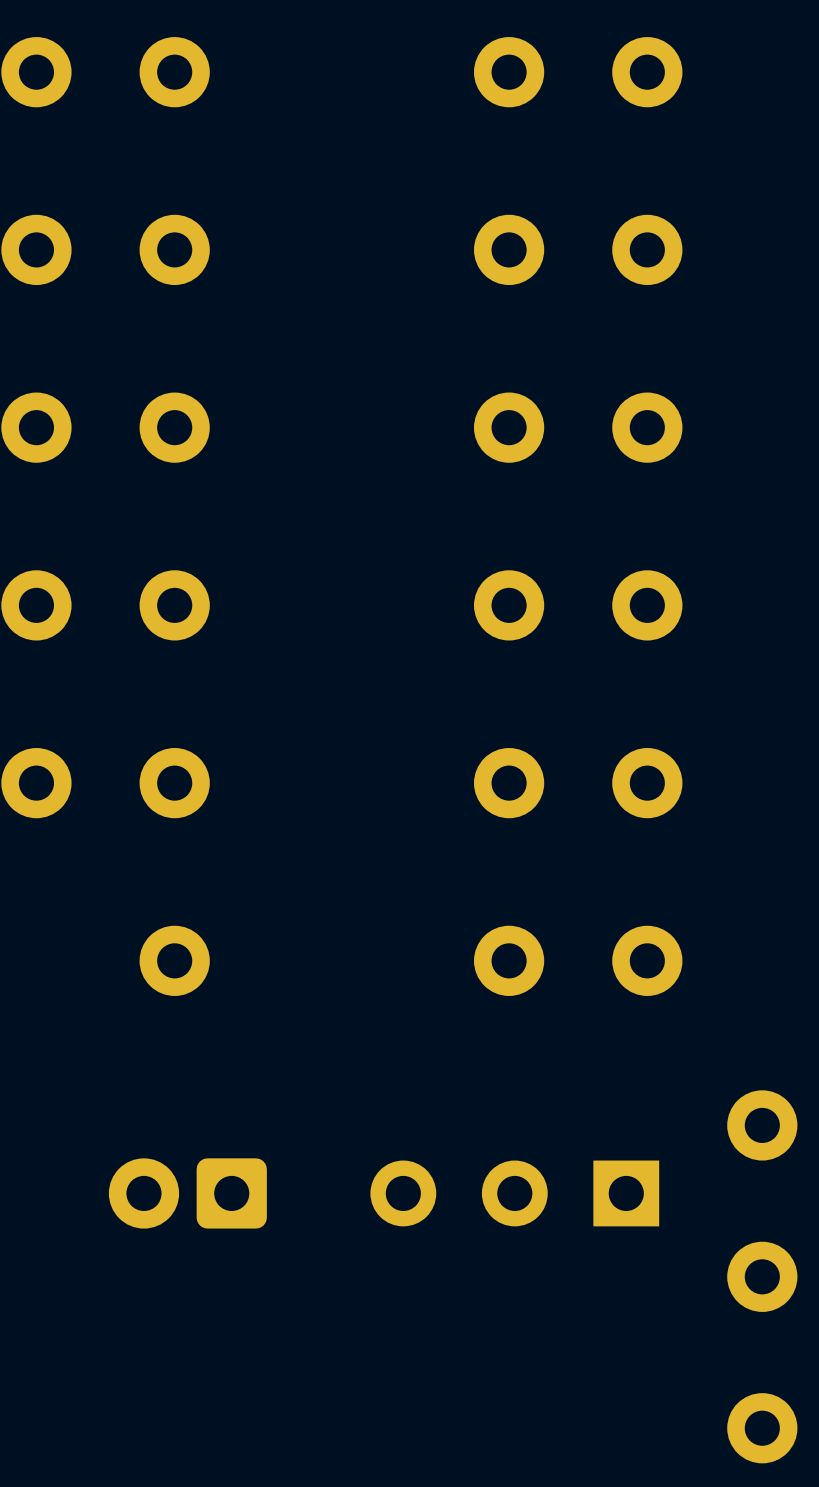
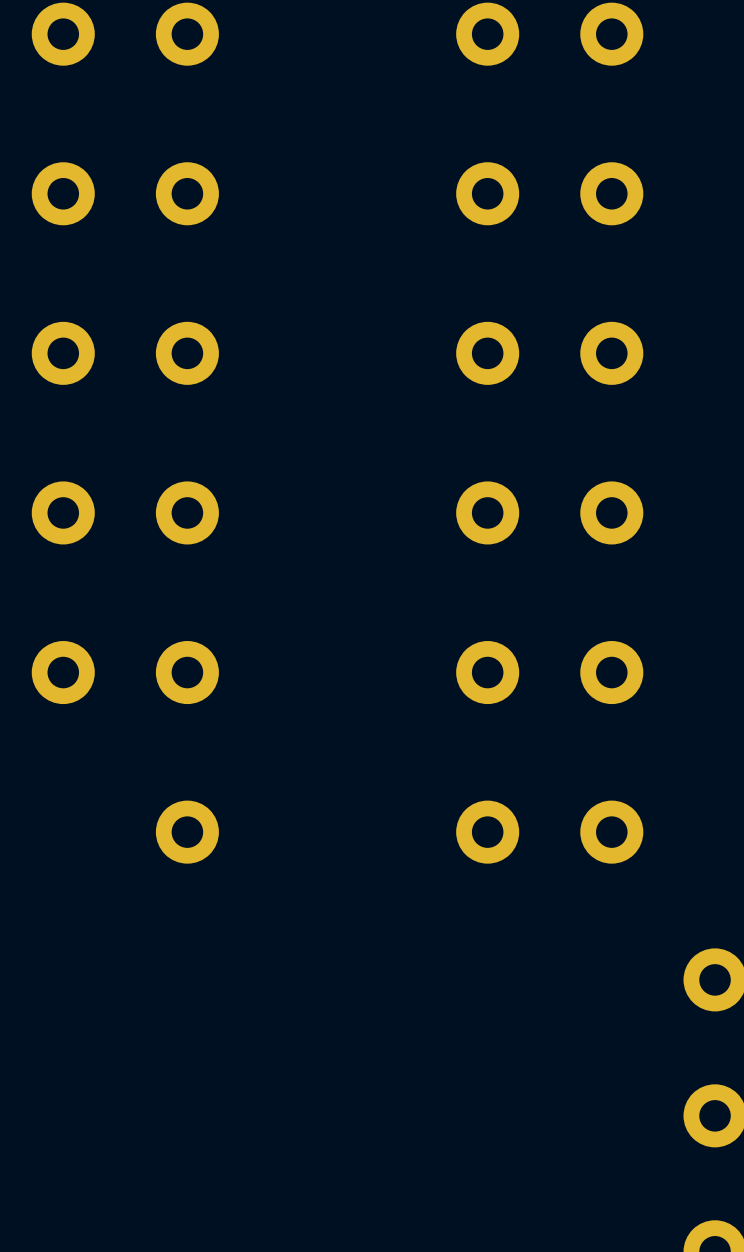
part: (187, 1193) -> none
part: (514, 1193) -> none

